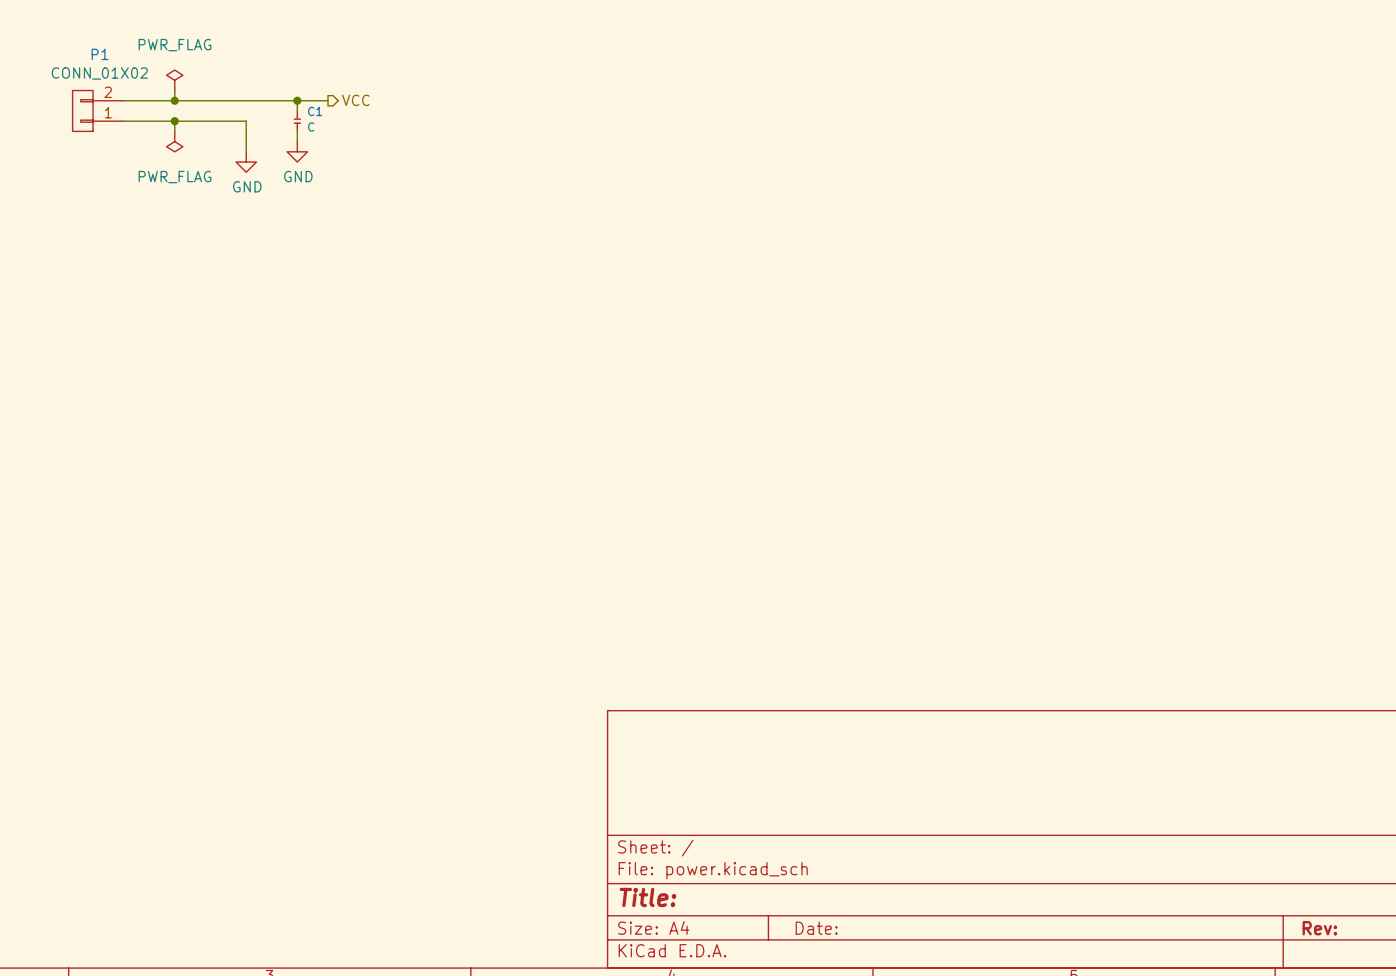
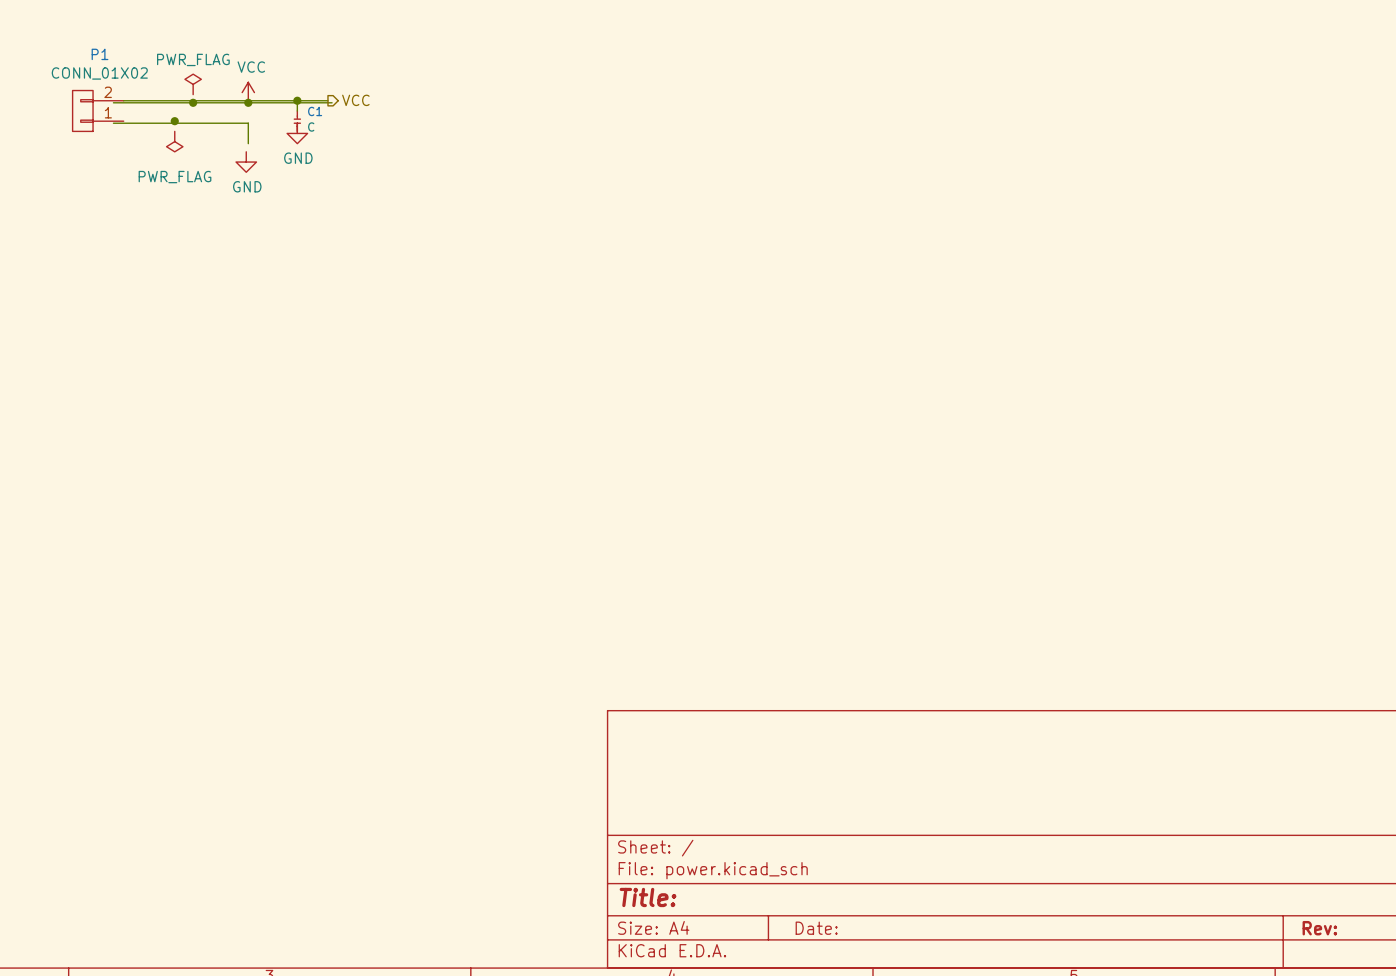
power symbol text position: PWR_FLAG (175, 45) -> PWR_FLAG (193, 59)
power symbol position: PWR_FLAG (174, 80) -> PWR_FLAG (193, 84)
wire: (174, 90) (174, 100) -> none
power symbol: none -> VCC (248, 92)
junction position: (174, 100) -> (193, 102)
wire: none -> (113, 102) (332, 102)
junction: none -> (248, 102)
wire: (123, 121) (246, 121) (246, 151) -> none
wire: (174, 121) (174, 131) -> none
wire: none -> (113, 123) (248, 123) (248, 143)
wire: (297, 131) (297, 141) -> none
power symbol position: GND (297, 151) -> GND (297, 133)

